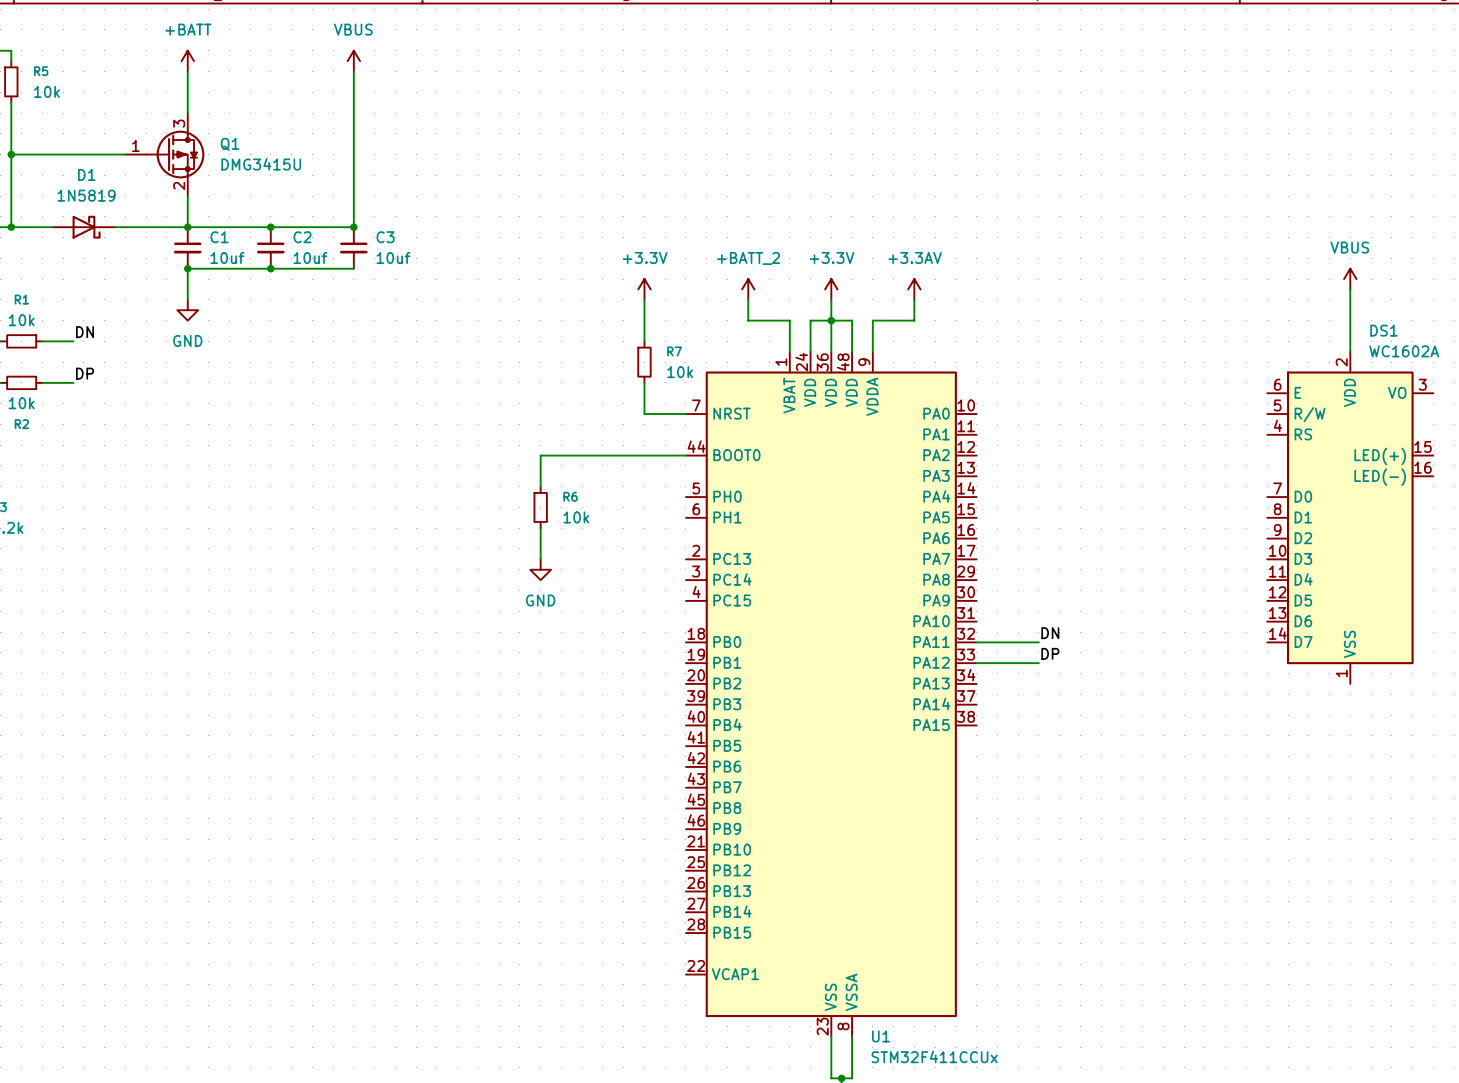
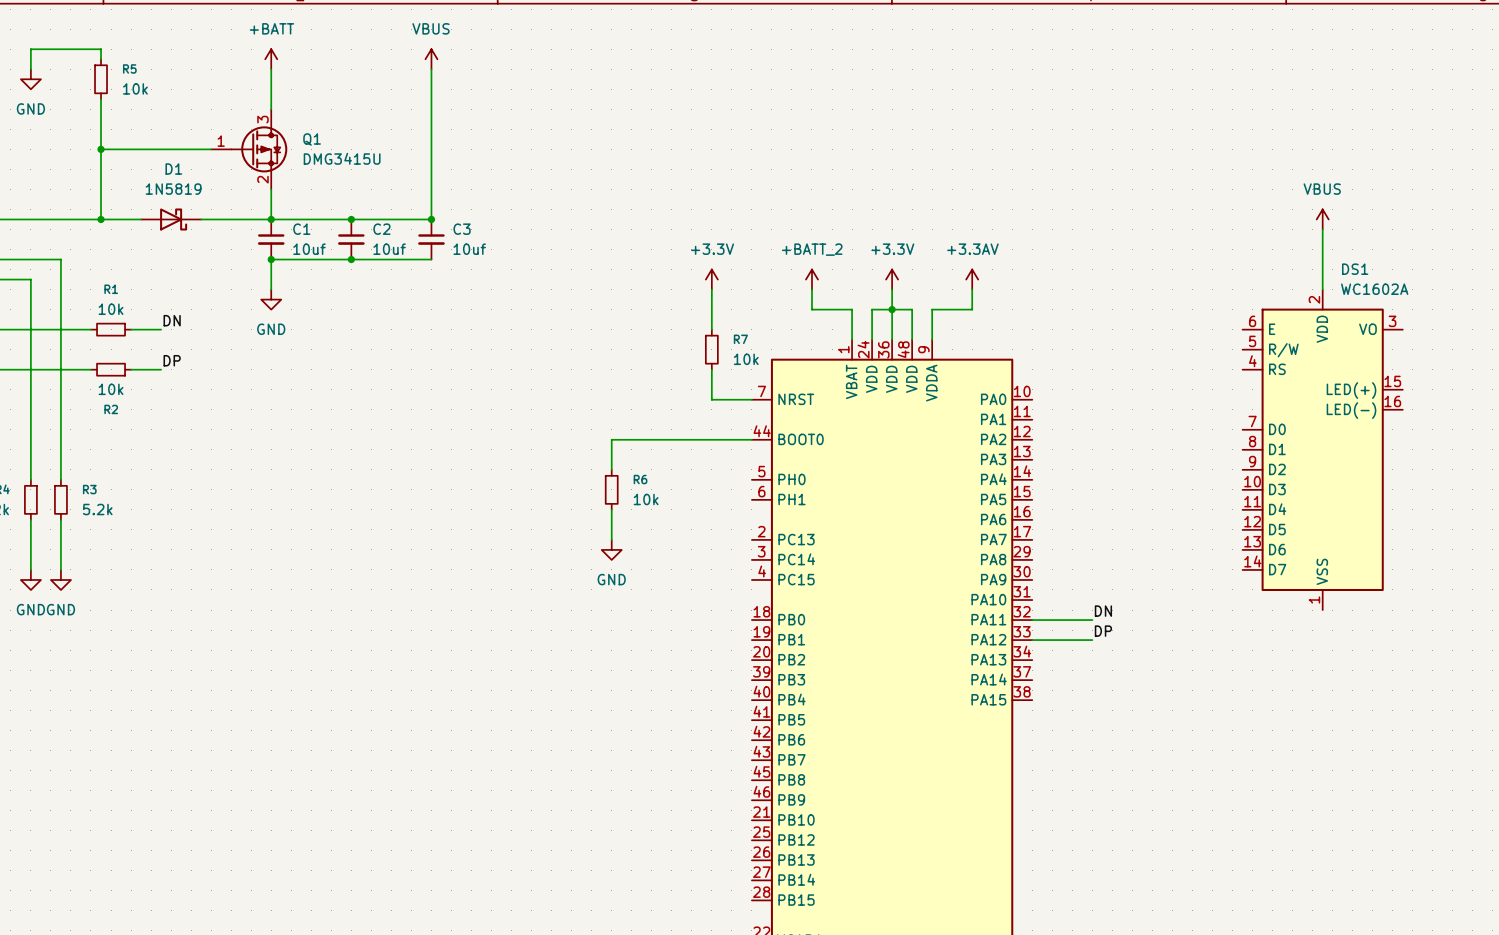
power symbol position: VBUS (1350, 279) -> VBUS (1322, 219)
wire: (1350, 289) (1350, 351) -> (1322, 229) (1322, 289)
DS1 position: (1350, 517) -> (1322, 449)

